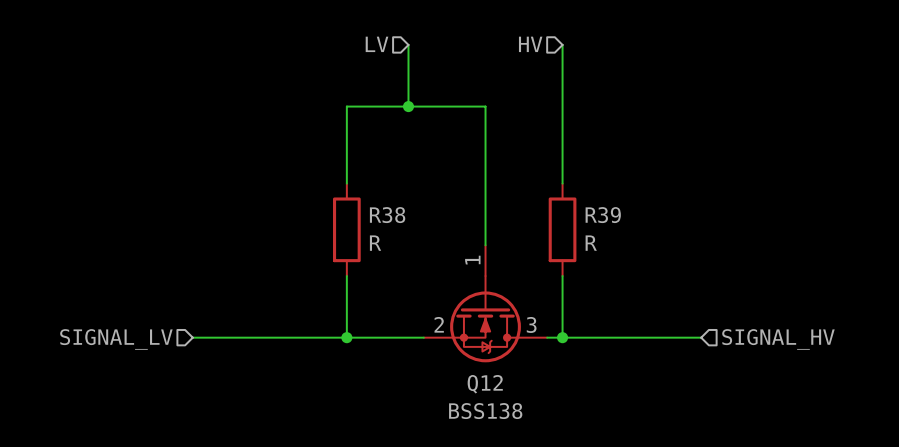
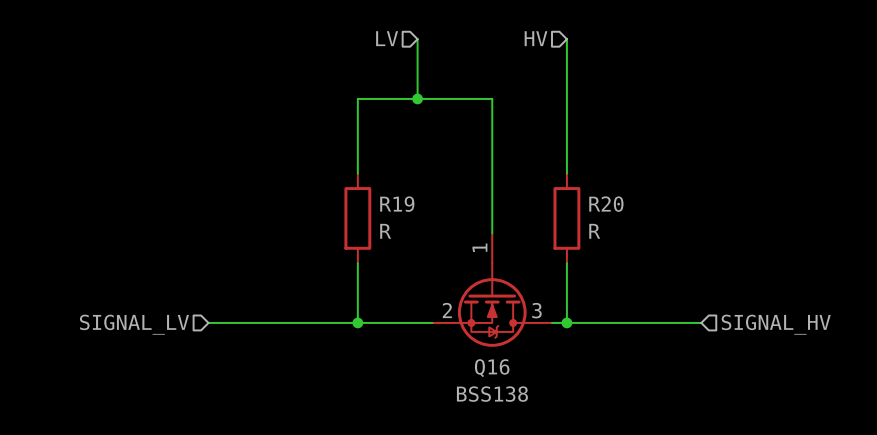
R38 name: R38 (387, 215) -> R19 (397, 204)
R39 name: R39 (603, 215) -> R20 (606, 204)
Q12 name: Q12 (485, 384) -> Q16 (492, 368)

